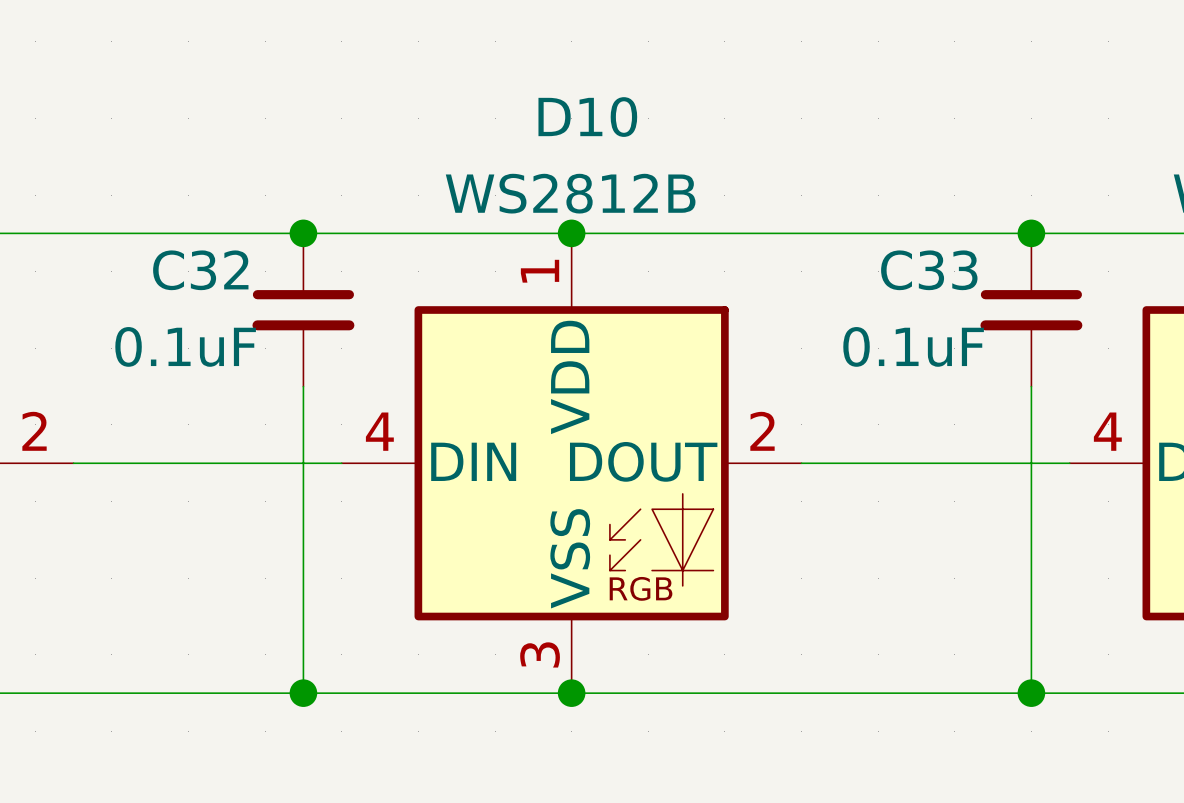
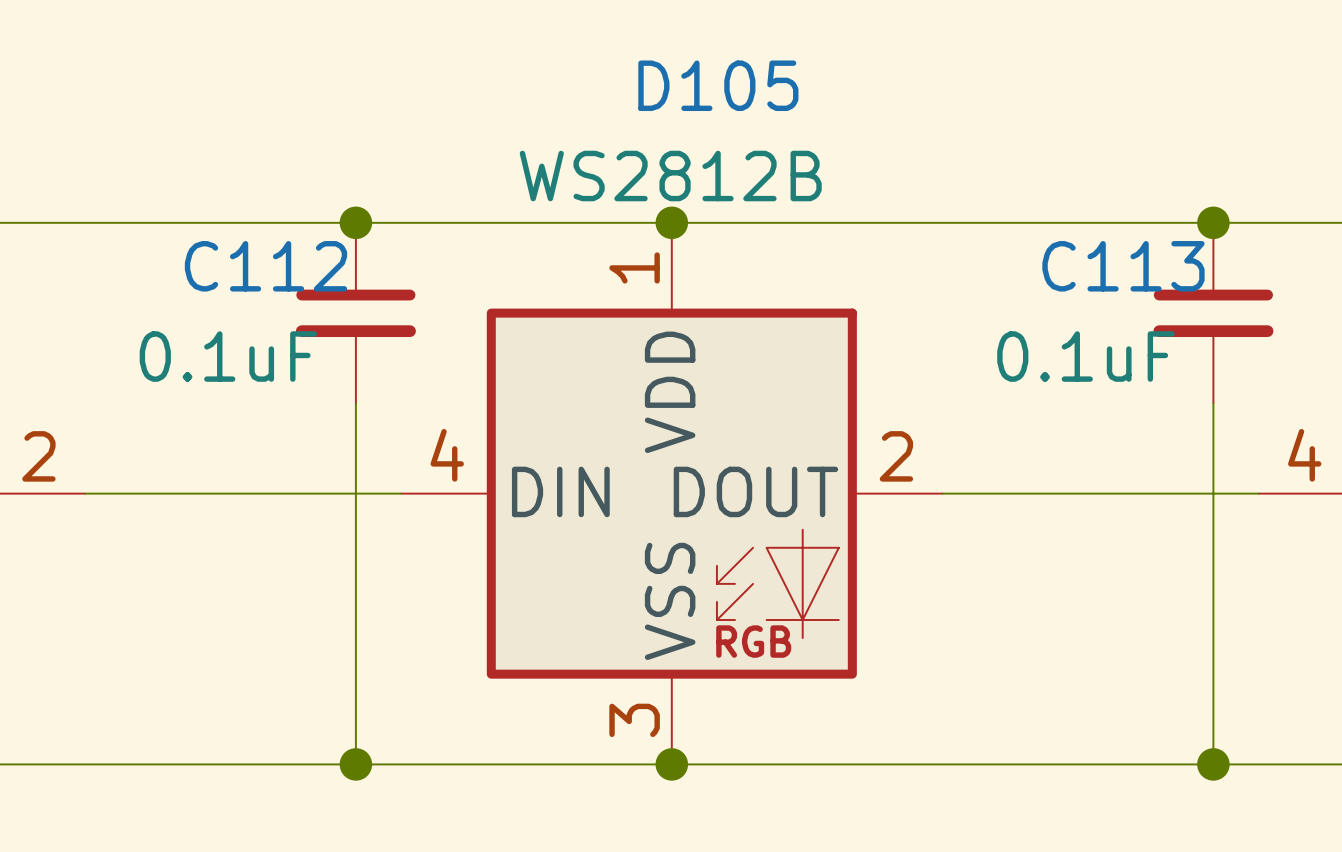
D10 name: D10 (587, 117) -> D105 (718, 85)
C32 name: C32 (200, 270) -> C112 (265, 266)
C33 name: C33 (929, 270) -> C113 (1123, 266)

